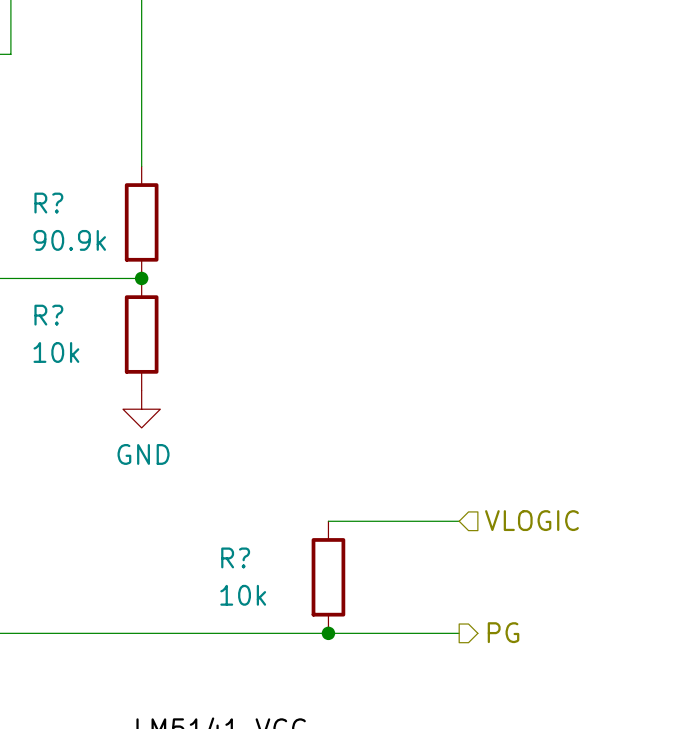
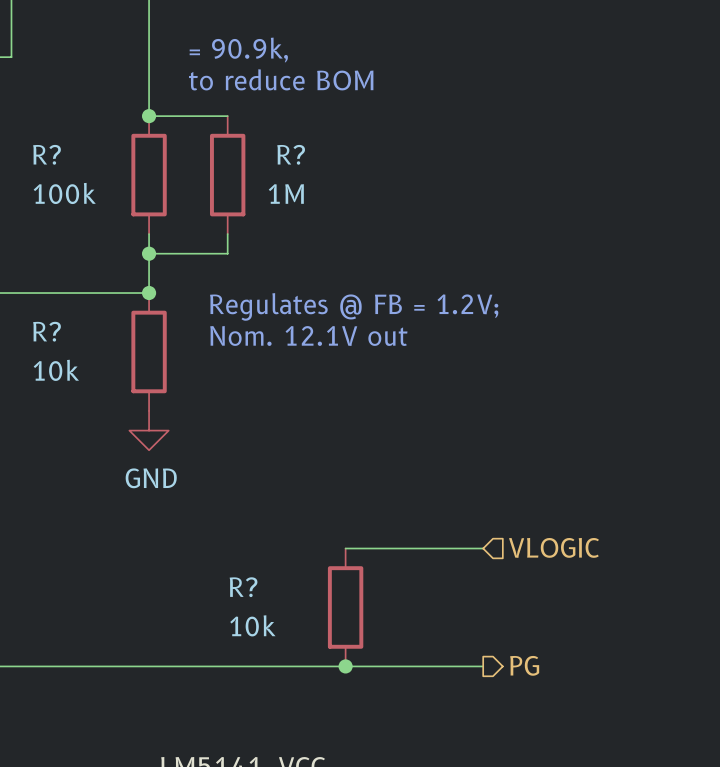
text: none -> = 90.9k, (238, 50)
text: none -> to reduce BOM (281, 79)
wire: (141, 110) (141, 166) -> (149, 116) (227, 116)
junction: none -> (149, 116)
R?: none -> 100k (149, 175)
R?: none -> 1M (227, 175)
wire: none -> (149, 234) (149, 293)
R?: 90.9k (141, 222) -> none
wire: none -> (227, 234) (227, 253) (149, 253)
junction: none -> (149, 253)
text: none -> Regulates @ FB = 1.2V; (354, 306)
text: none -> Nom. 12.1V out (308, 336)

